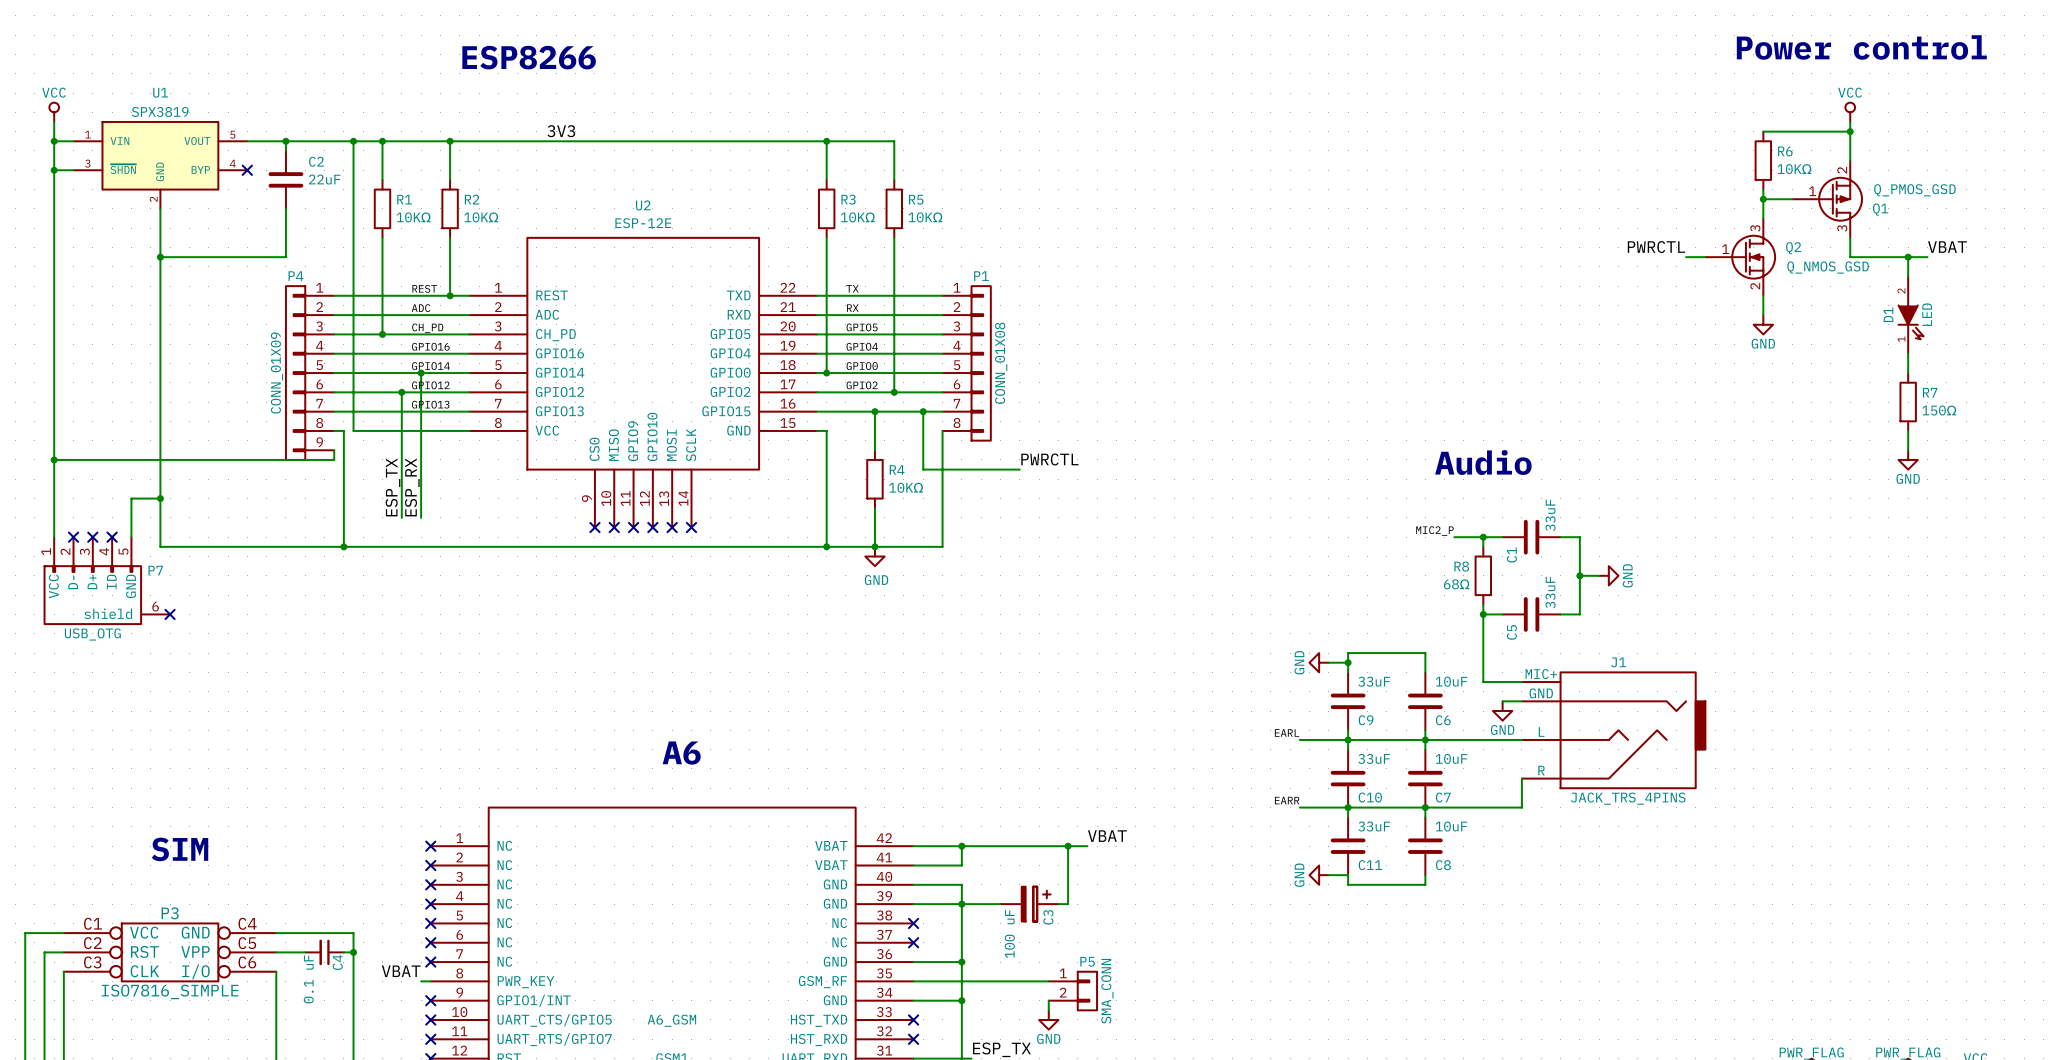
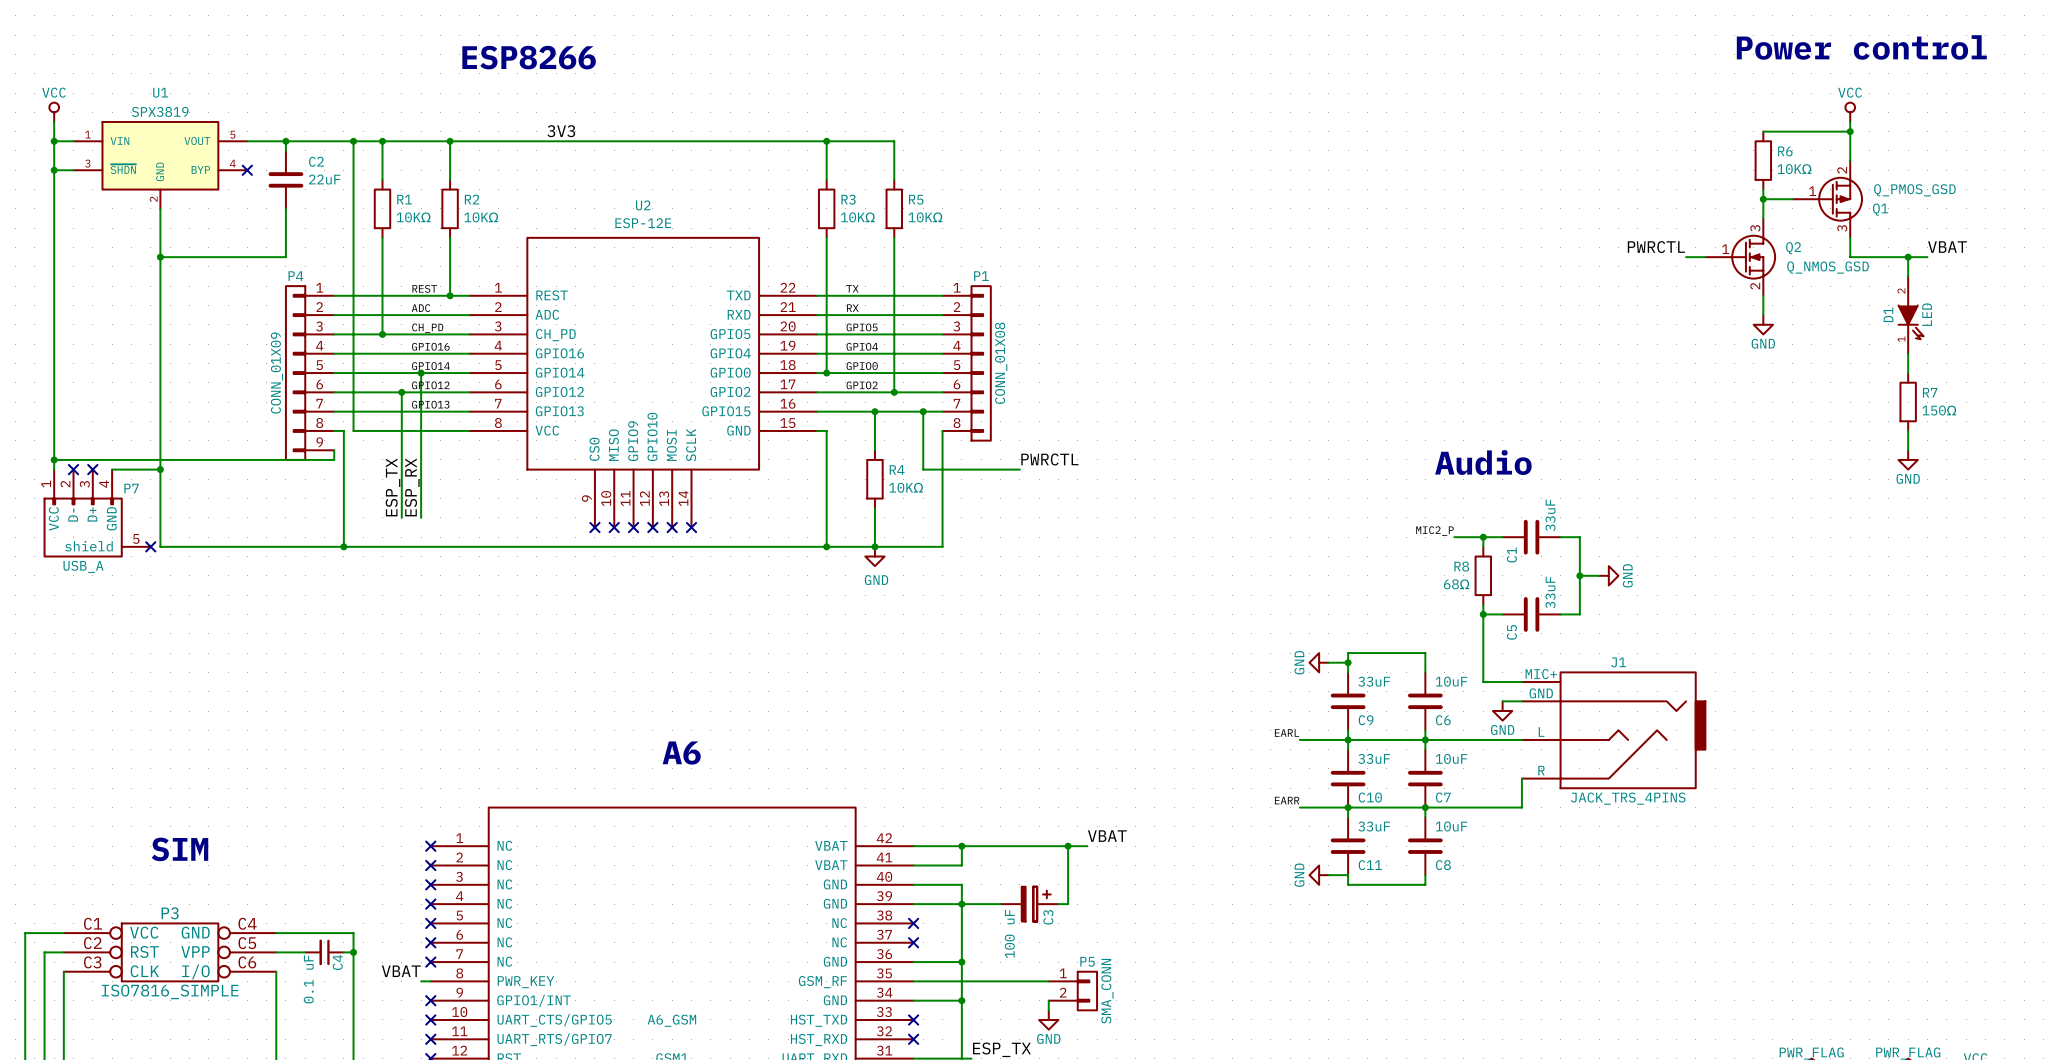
no-connect mark: none -> (73, 469)
no-connect mark: none -> (92, 469)
wire: none -> (112, 469) (160, 469)
wire: (160, 498) (131, 498) (131, 537) -> none
junction position: (160, 498) -> (160, 469)
P7 symbol: [44, 537, 171, 625] -> [44, 469, 151, 557]
no-connect mark: (73, 537) -> none
no-connect mark: (92, 537) -> none
no-connect mark: (112, 537) -> none
no-connect mark: none -> (150, 546)
P7 name position: P7 (155, 570) -> P7 (131, 488)
no-connect mark: (170, 614) -> none
P7 value: USB_OTG (92, 634) -> USB_A (83, 566)

